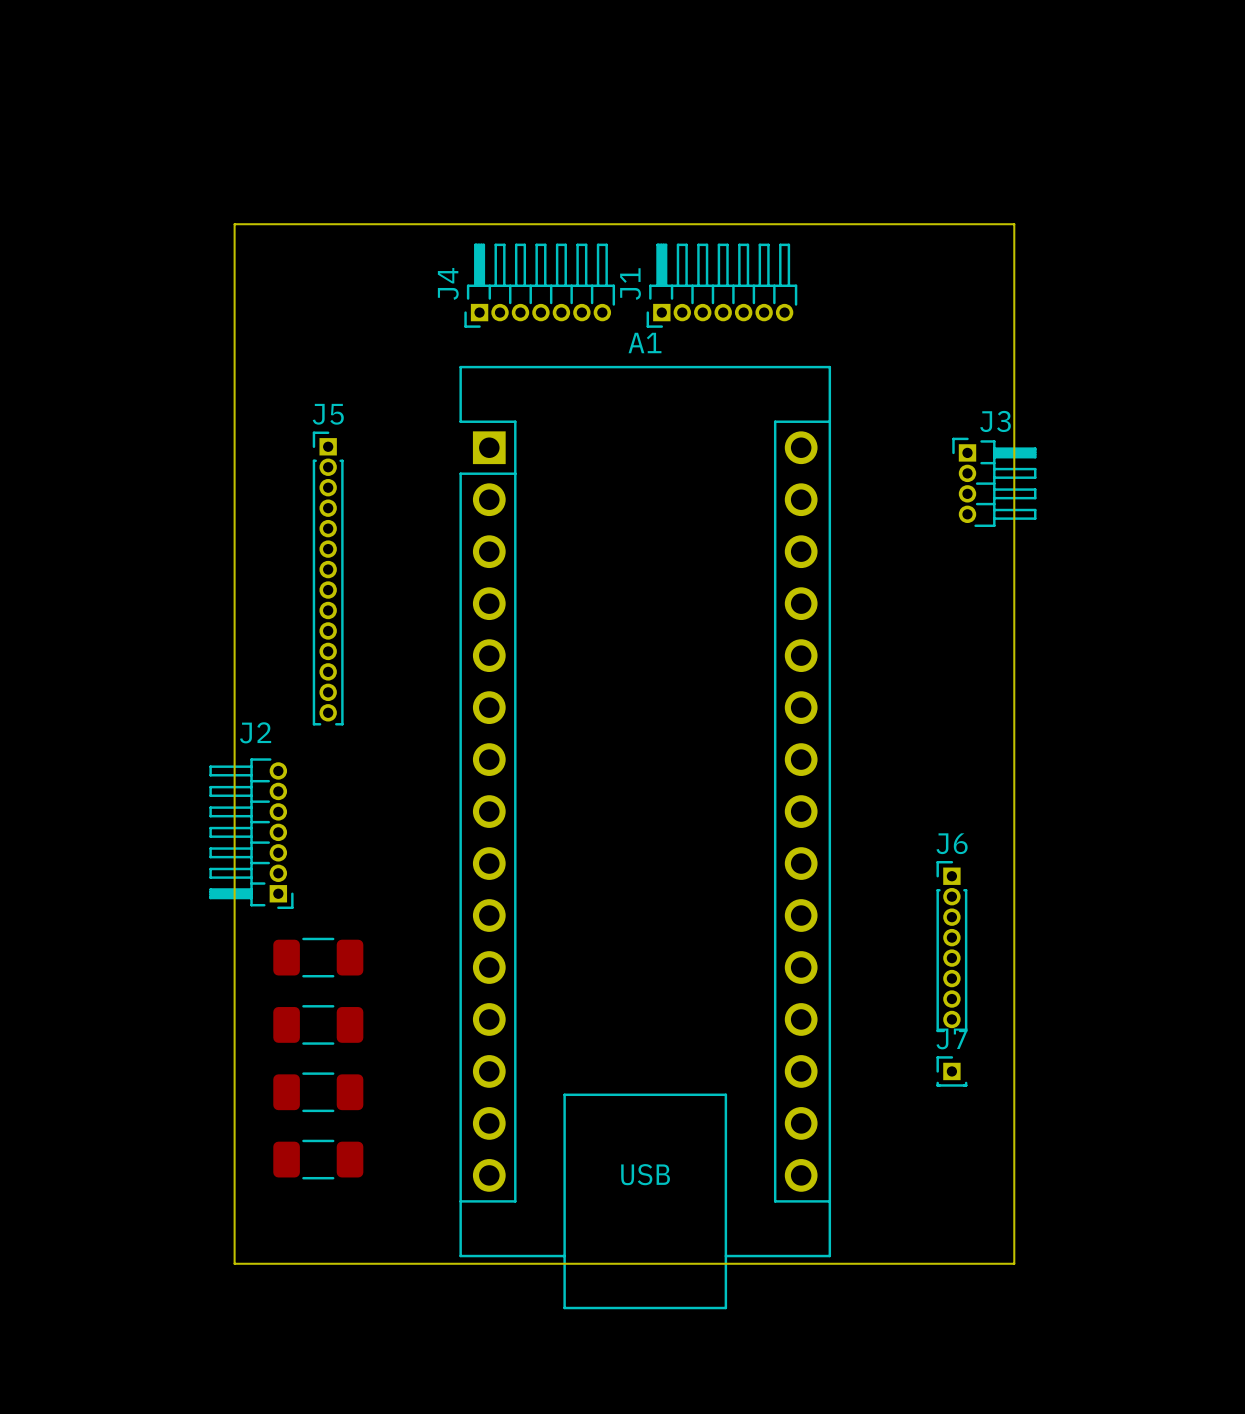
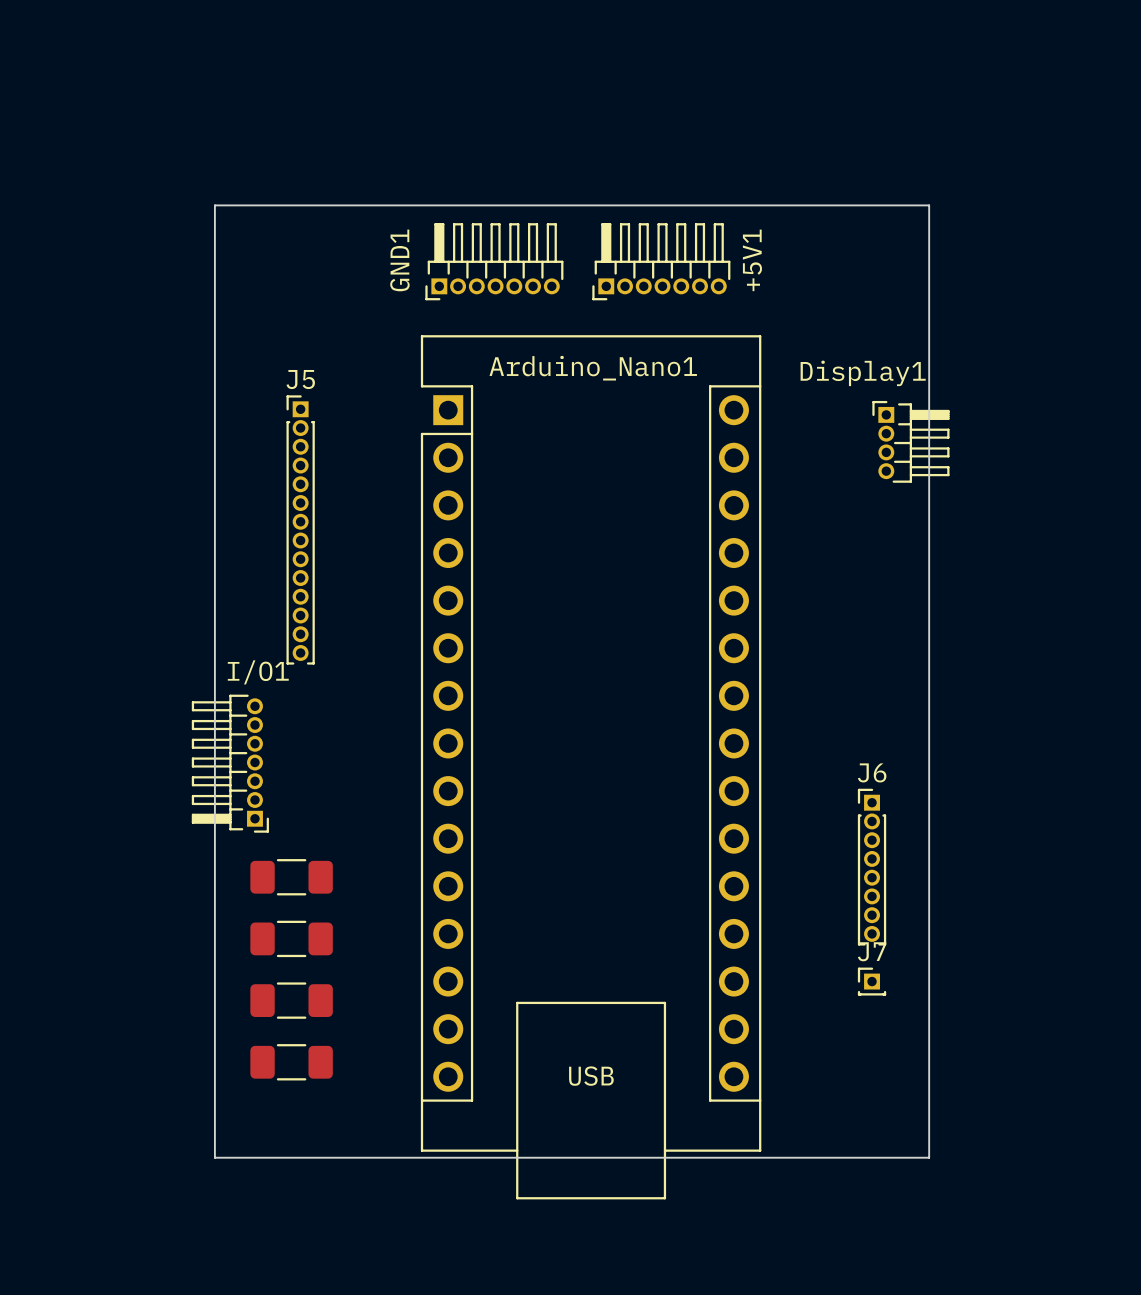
J4 name: J4 (448, 283) -> GND1 (399, 260)
J1 name: J1 (630, 284) -> +5V1 (752, 260)
A1 name: A1 (645, 343) -> Arduino_Nano1 (593, 368)
J3 name: J3 (995, 421) -> Display1 (863, 373)
J2 name: J2 (255, 732) -> I/O1 (258, 672)

